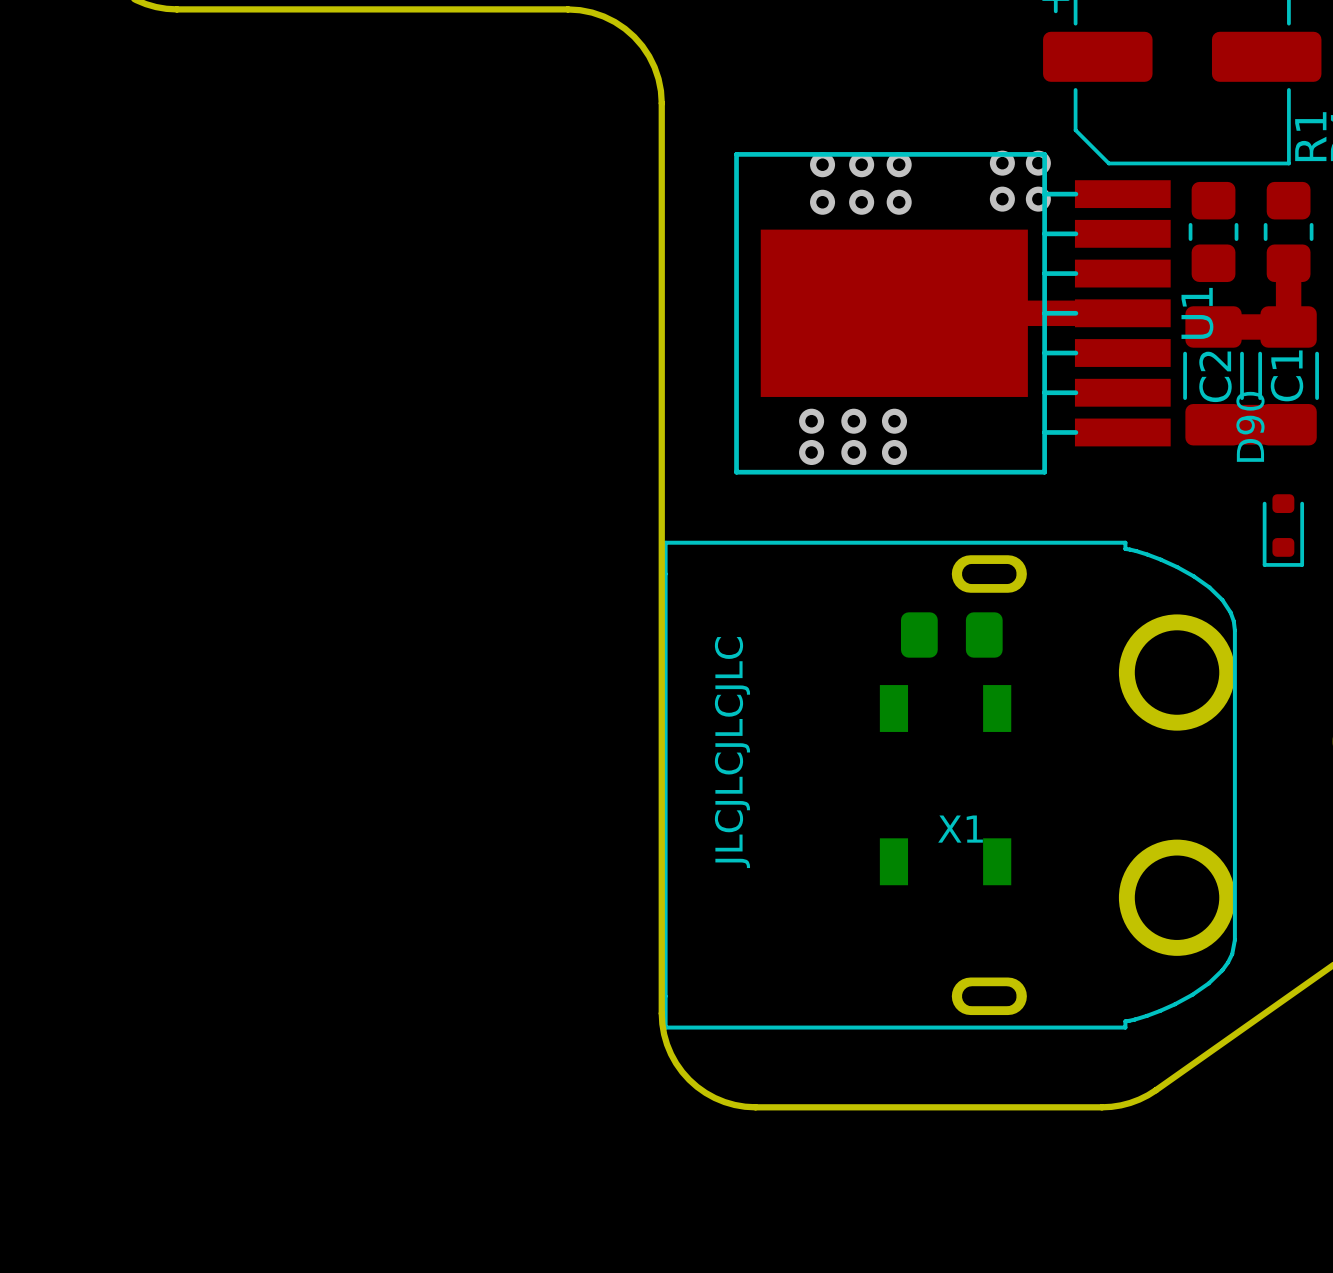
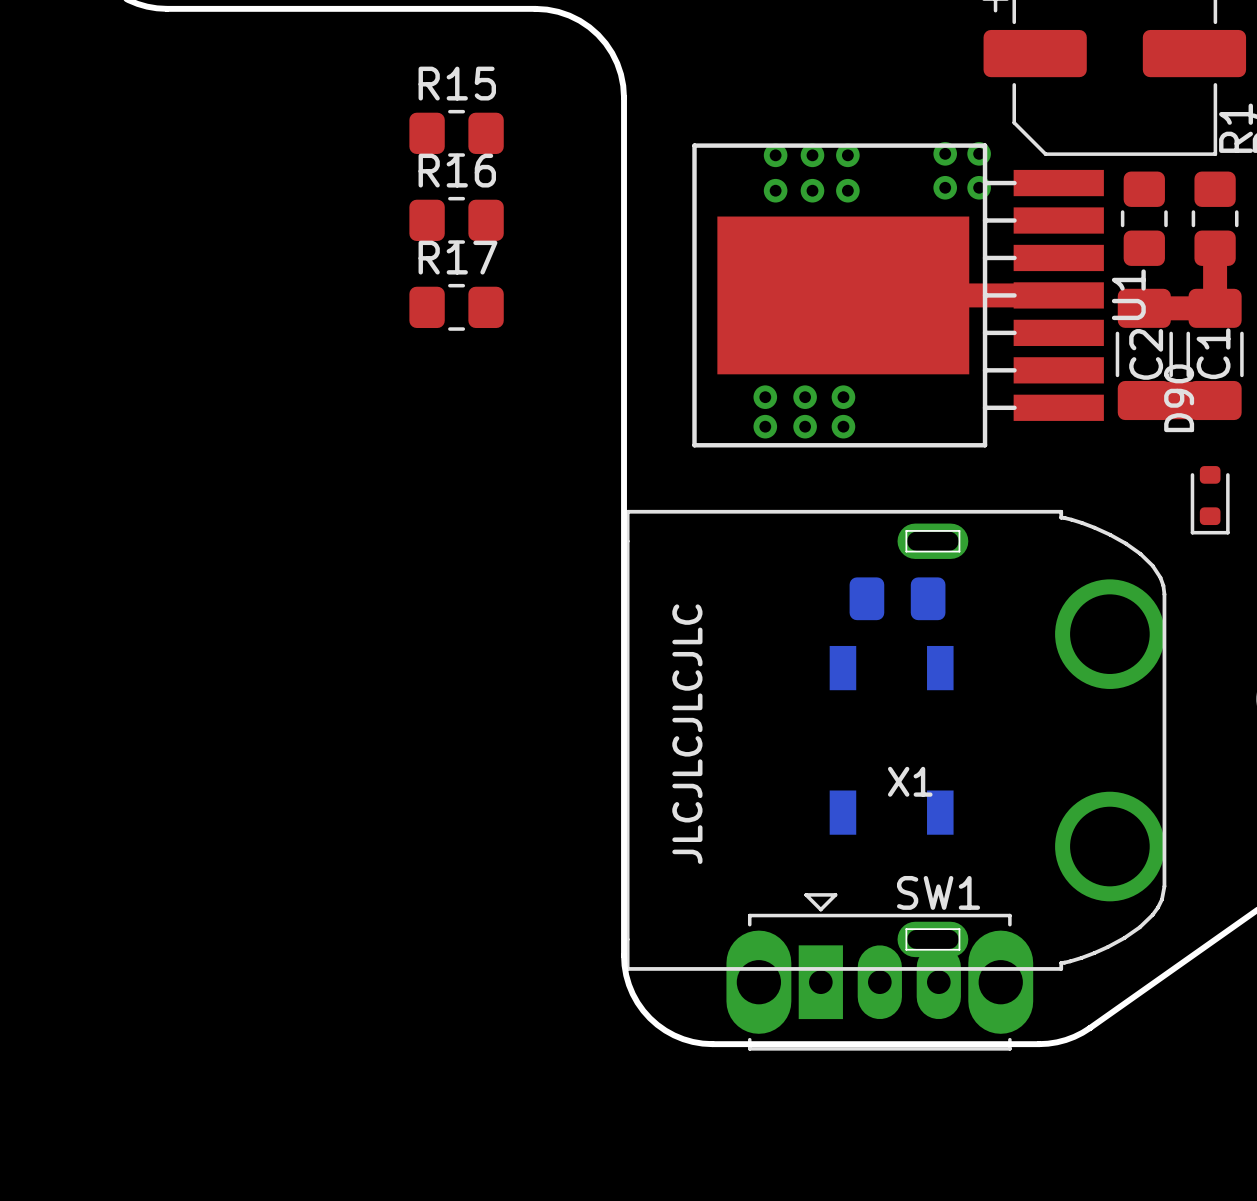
R15: none -> (456, 133)
R16: none -> (456, 220)
R17: none -> (456, 307)
SW1: none -> (879, 971)

